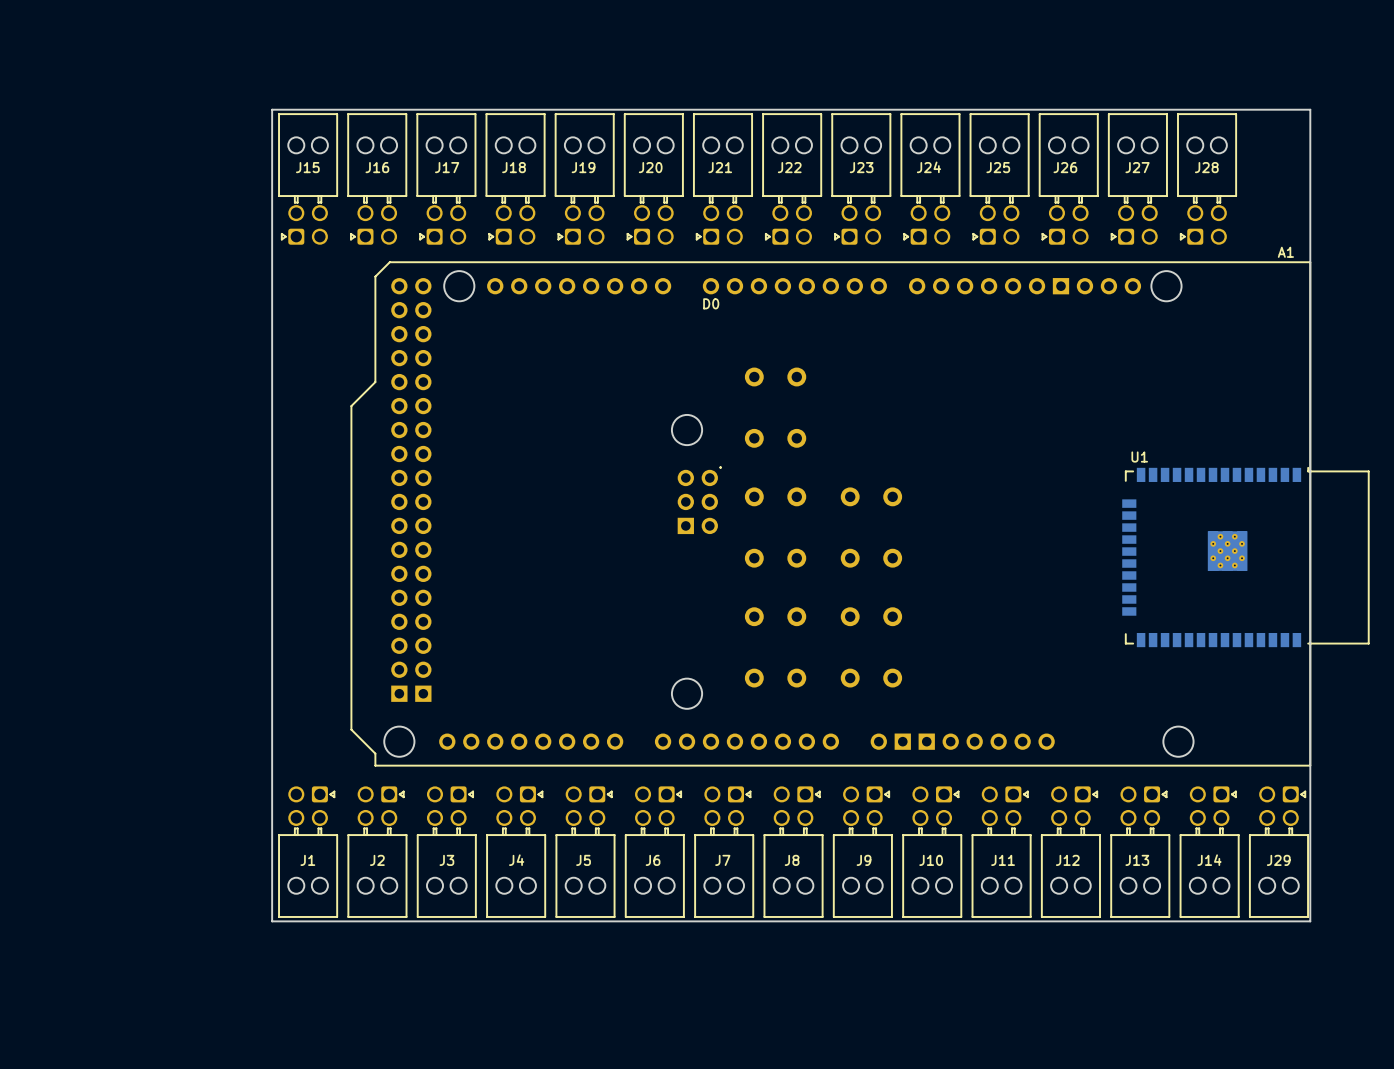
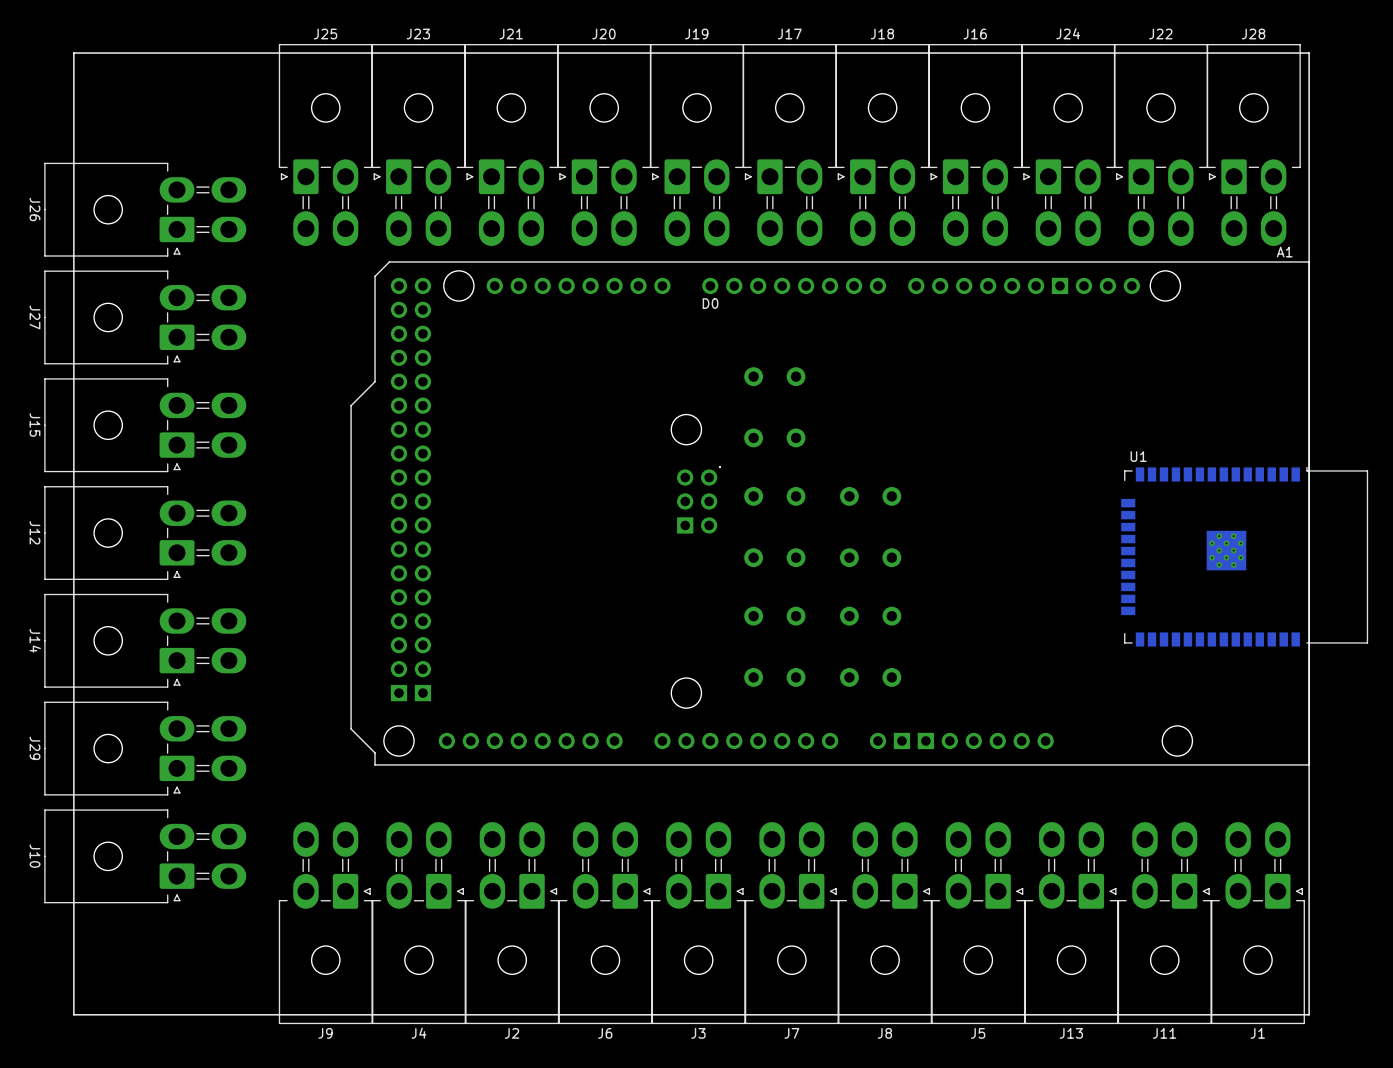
board edge: (1310, 109) (272, 109) (272, 921) (1310, 921) -> (1309, 109) (1309, 53) (73, 53) (73, 1014) (1309, 1014) (1309, 920)
J15 footprint: [278, 113, 338, 245] -> [44, 378, 247, 473]
J16 footprint: [347, 113, 407, 245] -> [928, 44, 1023, 247]
J17 footprint: [416, 113, 477, 245] -> [742, 44, 837, 247]
J18 footprint: [485, 113, 546, 245] -> [835, 44, 930, 247]
J19 footprint: [555, 113, 615, 245] -> [650, 44, 744, 247]
J20 footprint: [624, 113, 684, 245] -> [557, 44, 652, 247]
J21 footprint: [693, 113, 753, 245] -> [464, 44, 559, 247]
J22 footprint: [762, 113, 822, 245] -> [1114, 44, 1208, 247]
J23 footprint: [831, 113, 891, 245] -> [371, 44, 466, 247]
J24 footprint: [900, 113, 961, 245] -> [1021, 44, 1116, 247]
J25 footprint: [969, 113, 1030, 245] -> [278, 44, 373, 247]
J26 footprint: [1039, 113, 1099, 245] -> [44, 162, 247, 257]
J27 footprint: [1108, 113, 1168, 245] -> [44, 270, 247, 365]
J28 footprint: [1177, 113, 1237, 245] -> [1206, 44, 1301, 247]
J15 name position: J15 (307, 167) -> J15 (35, 425)
J16 name position: J16 (377, 167) -> J16 (975, 34)
J17 name position: J17 (447, 167) -> J17 (789, 34)
J18 name position: J18 (514, 167) -> J18 (882, 34)
J19 name position: J19 (583, 167) -> J19 (696, 34)
J20 name position: J20 (650, 167) -> J20 (603, 34)
J21 name position: J21 (720, 167) -> J21 (511, 34)
J22 name position: J22 (789, 167) -> J22 (1160, 34)
J23 name position: J23 (861, 167) -> J23 (418, 34)
J24 name position: J24 (928, 167) -> J24 (1068, 33)
J25 name position: J25 (998, 167) -> J25 (325, 34)
J26 name position: J26 (1065, 167) -> J26 (35, 209)
J27 name position: J27 (1137, 167) -> J27 (35, 317)
J28 name position: J28 (1206, 167) -> J28 (1253, 34)
J1 footprint: [278, 786, 338, 918] -> [1211, 822, 1305, 1025]
J2 footprint: [347, 786, 408, 918] -> [465, 822, 560, 1025]
J3 footprint: [417, 786, 477, 918] -> [651, 822, 746, 1025]
J4 footprint: [486, 786, 546, 918] -> [372, 822, 466, 1025]
J5 footprint: [555, 786, 616, 918] -> [931, 822, 1026, 1025]
J6 footprint: [625, 786, 685, 918] -> [558, 822, 653, 1025]
J7 footprint: [694, 786, 754, 918] -> [745, 822, 839, 1025]
J8 footprint: [763, 786, 824, 918] -> [838, 822, 932, 1025]
J9 footprint: [833, 786, 893, 918] -> [278, 822, 373, 1025]
J10 footprint: [902, 786, 962, 918] -> [44, 809, 247, 904]
J11 footprint: [971, 786, 1032, 918] -> [1117, 822, 1212, 1025]
J12 footprint: [1041, 786, 1101, 918] -> [44, 486, 247, 580]
J13 footprint: [1110, 786, 1170, 918] -> [1024, 822, 1119, 1025]
J14 footprint: [1179, 786, 1240, 918] -> [44, 593, 247, 688]
J29 footprint: [1249, 786, 1309, 918] -> [44, 701, 247, 796]
J1 name position: J1 (307, 860) -> J1 (1257, 1033)
J2 name position: J2 (377, 860) -> J2 (511, 1033)
J3 name position: J3 (446, 860) -> J3 (698, 1033)
J4 name position: J4 (516, 860) -> J4 (418, 1033)
J5 name position: J5 (583, 860) -> J5 (978, 1033)
J6 name position: J6 (653, 860) -> J6 (605, 1033)
J7 name position: J7 (722, 860) -> J7 (791, 1033)
J8 name position: J8 (792, 860) -> J8 (884, 1033)
J9 name position: J9 (864, 860) -> J9 (325, 1033)
J10 name position: J10 (931, 860) -> J10 (35, 856)
J11 name position: J11 (1003, 860) -> J11 (1164, 1033)
J12 name position: J12 (1067, 860) -> J12 (35, 532)
J13 name position: J13 (1137, 860) -> J13 (1071, 1033)
J14 name position: J14 (1209, 860) -> J14 (35, 640)
J29 name position: J29 (1278, 860) -> J29 (35, 748)

